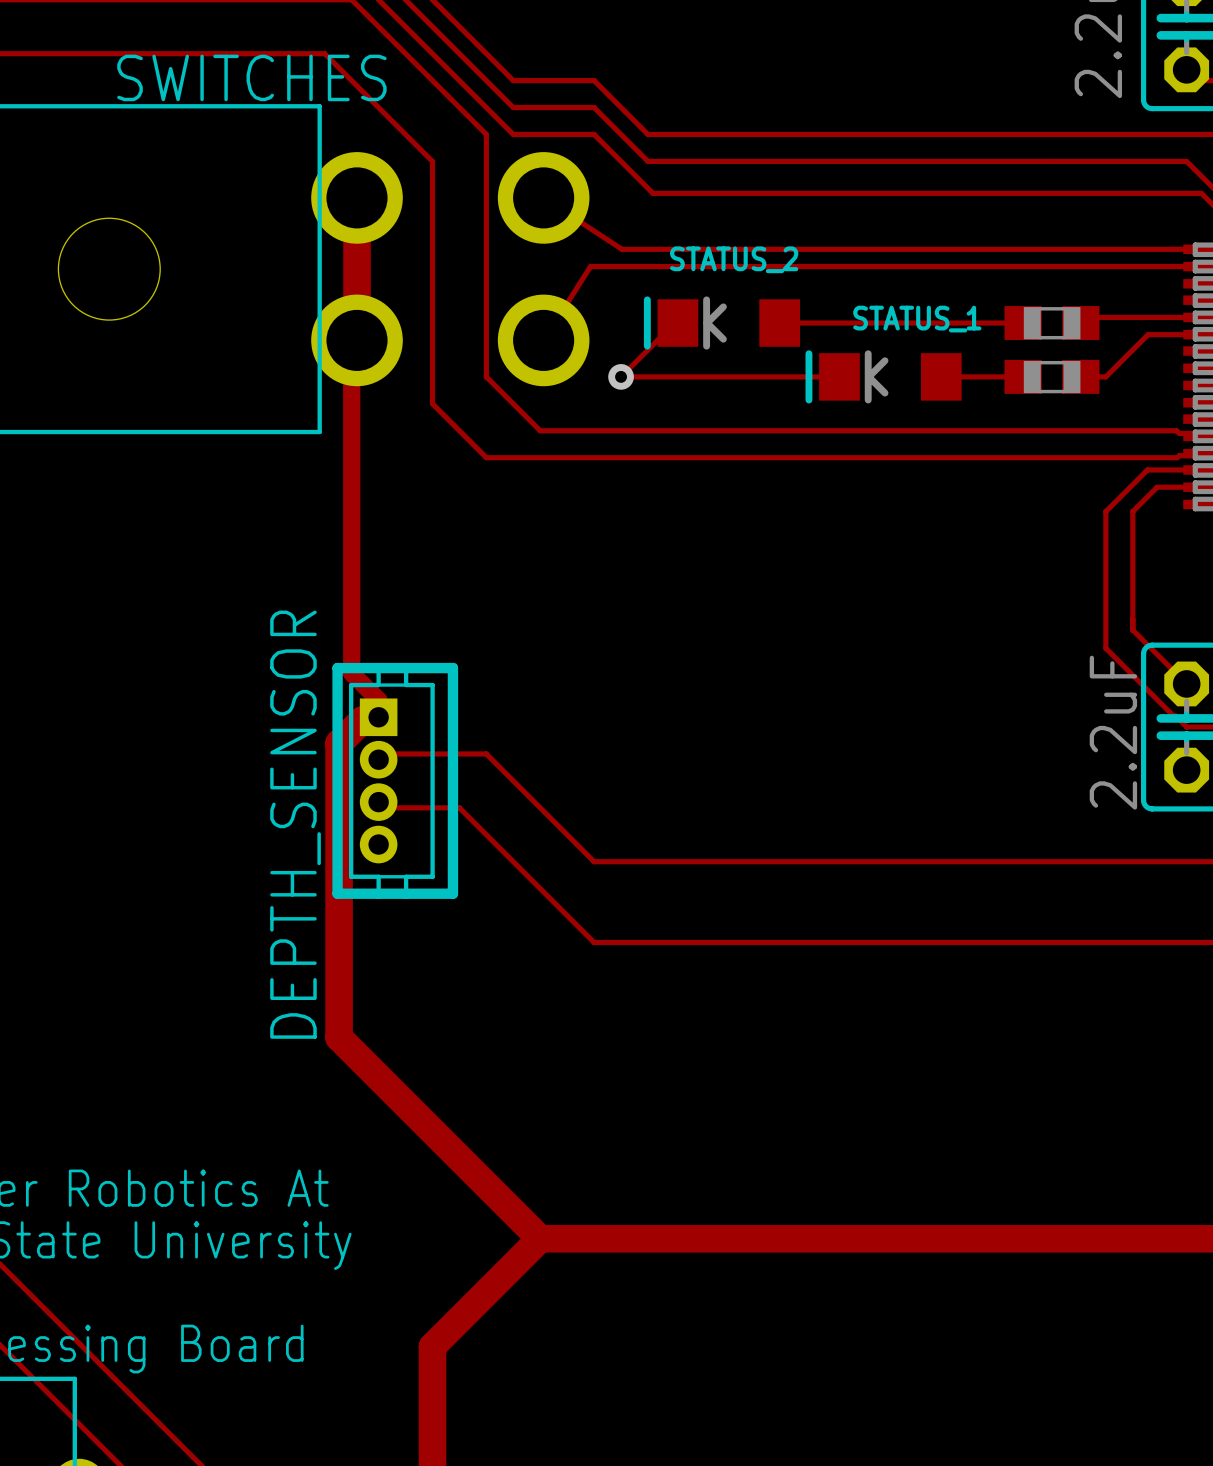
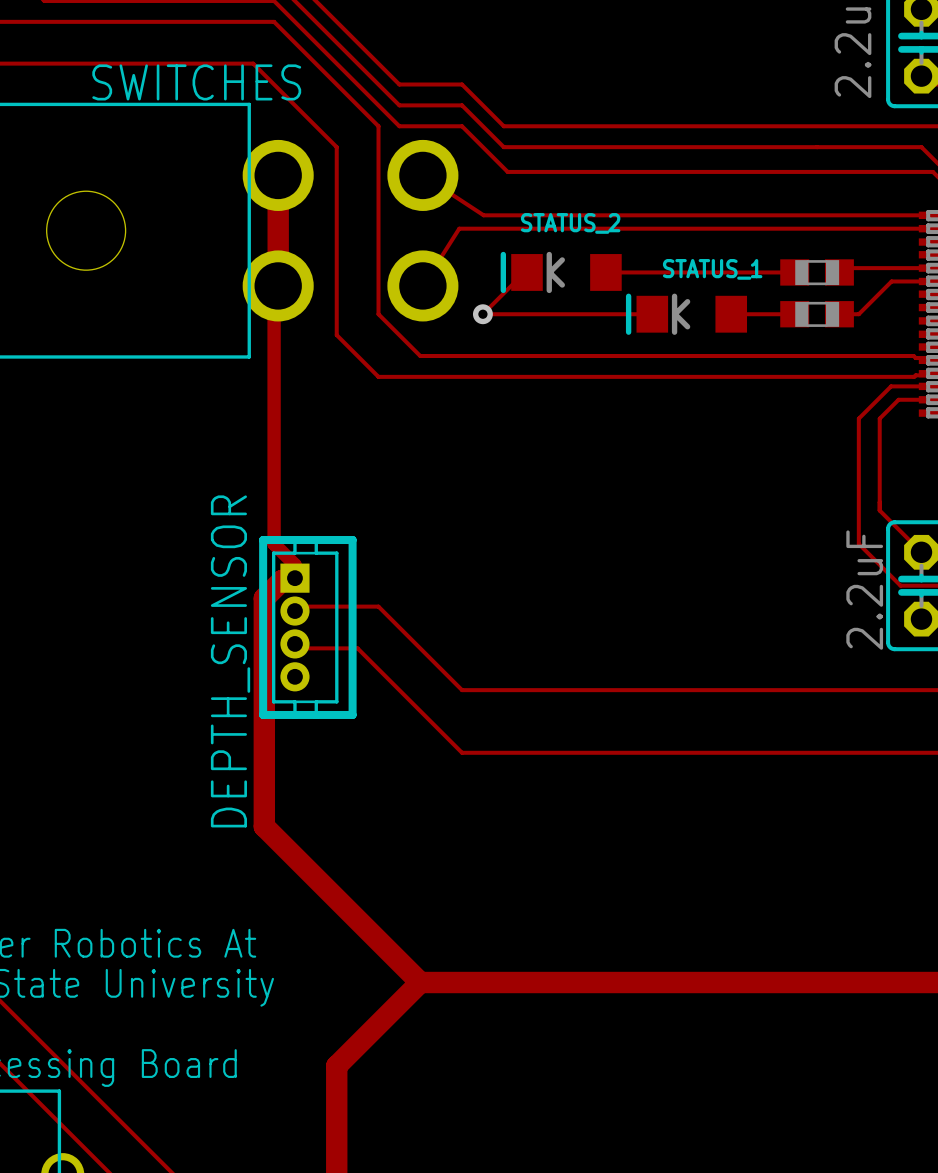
track: (1105, 648) (1186, 727) -> (858, 524) (858, 543) (900, 585) (921, 585)

